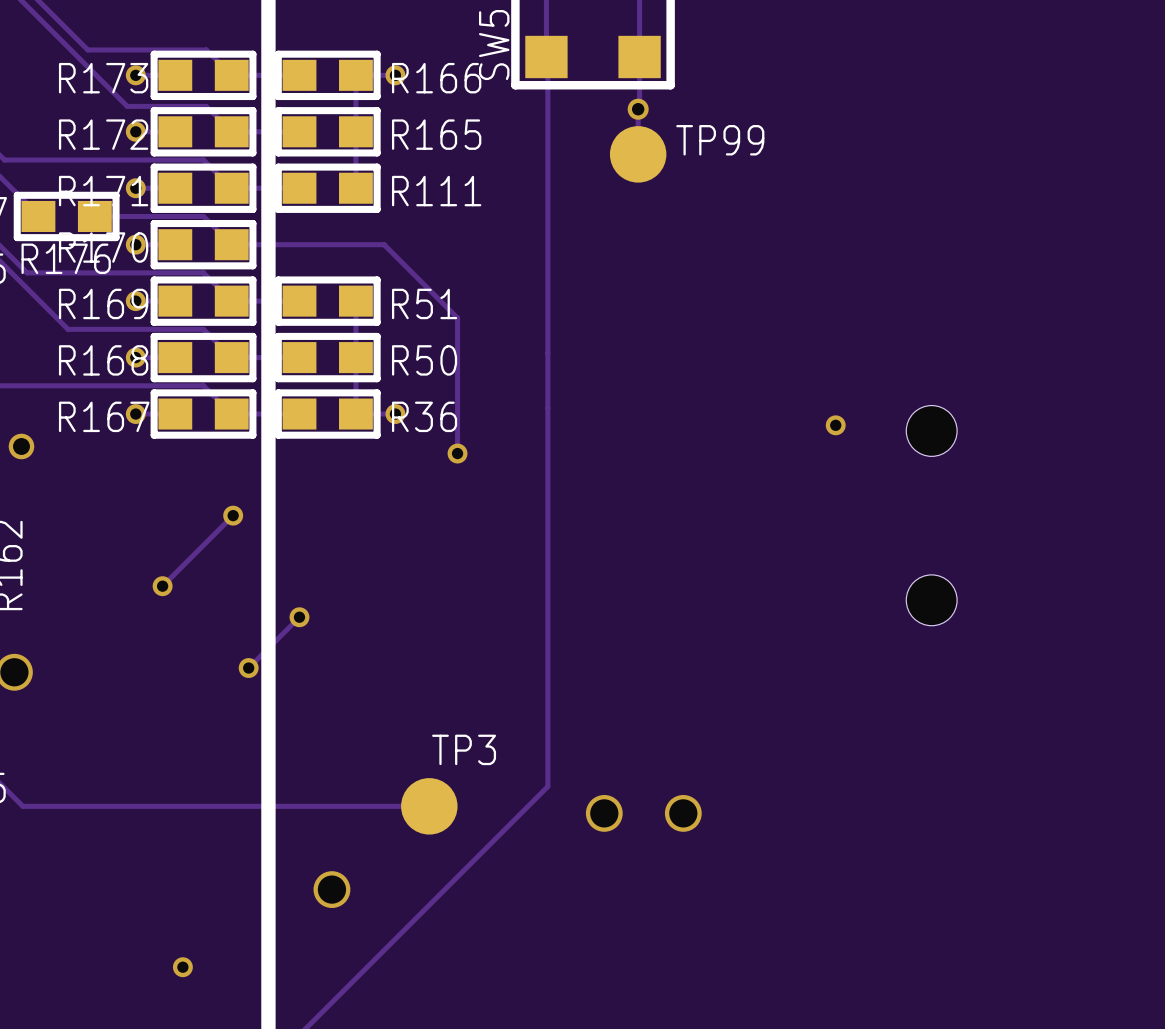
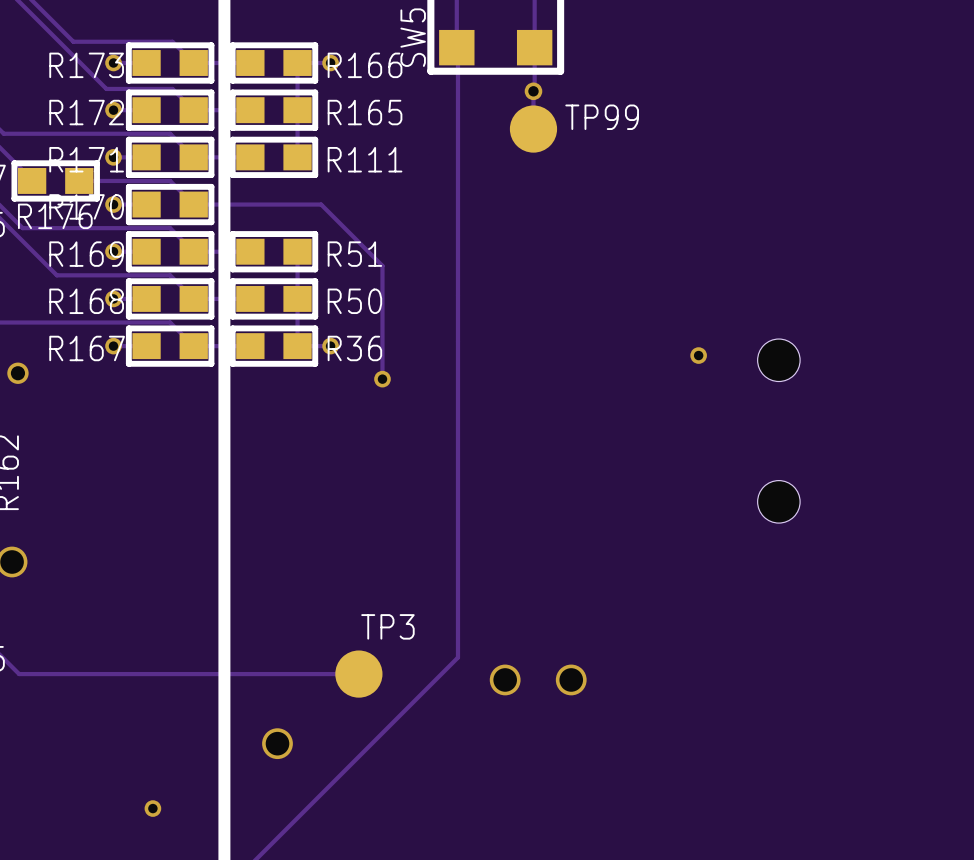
track: (233, 515) (162, 586) -> none
via: (233, 515) -> none
via: (162, 586) -> none
track: (299, 617) (248, 668) -> none
via: (299, 617) -> none
via: (248, 668) -> none

